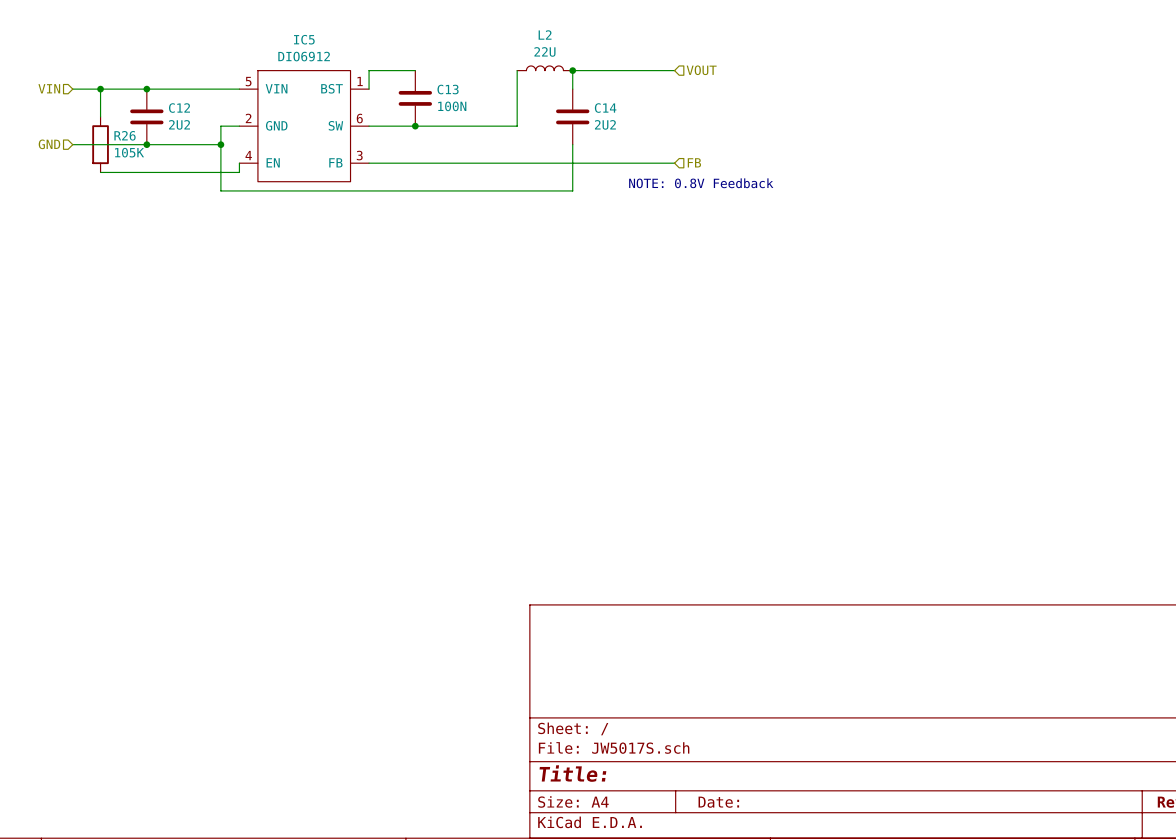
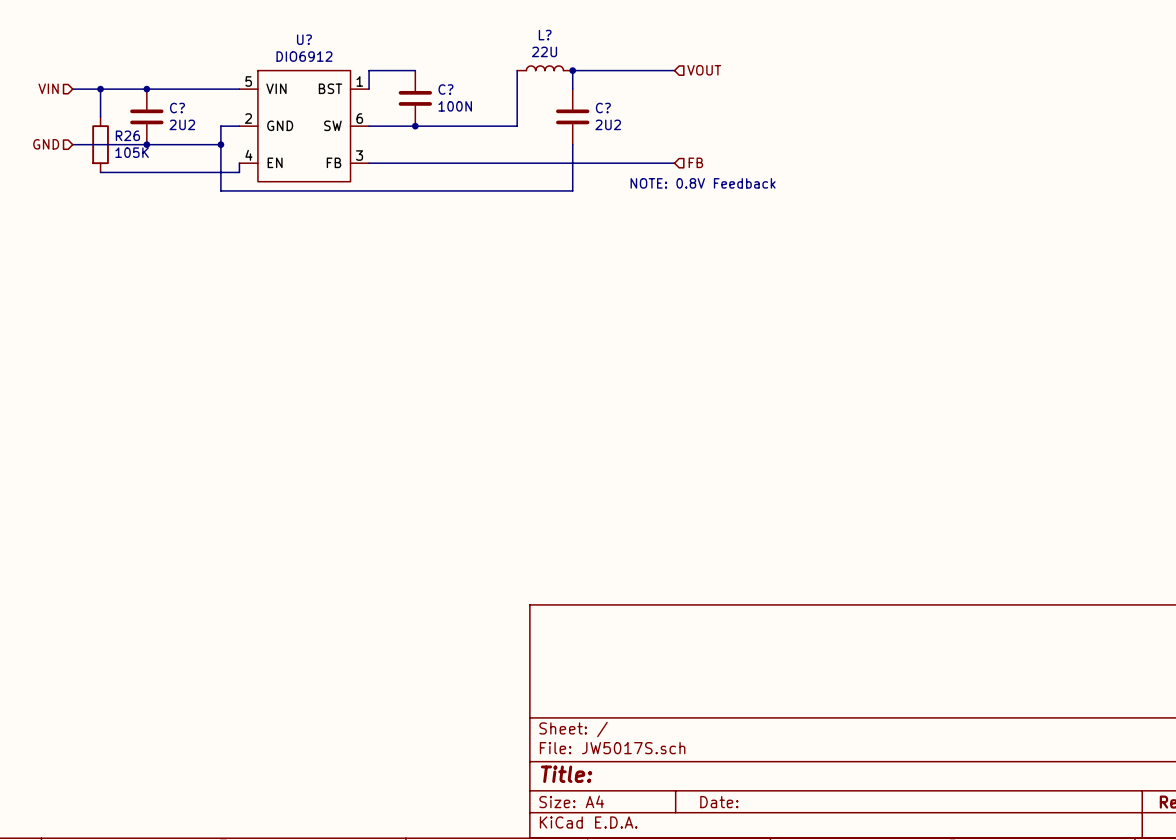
L2 name: L2 (545, 34) -> L? (545, 35)
IC5 name: IC5 (304, 39) -> U? (304, 39)
C13 name: C13 (448, 89) -> C? (445, 89)
C12 name: C12 (179, 108) -> C? (177, 108)
C14 name: C14 (605, 108) -> C? (603, 108)

